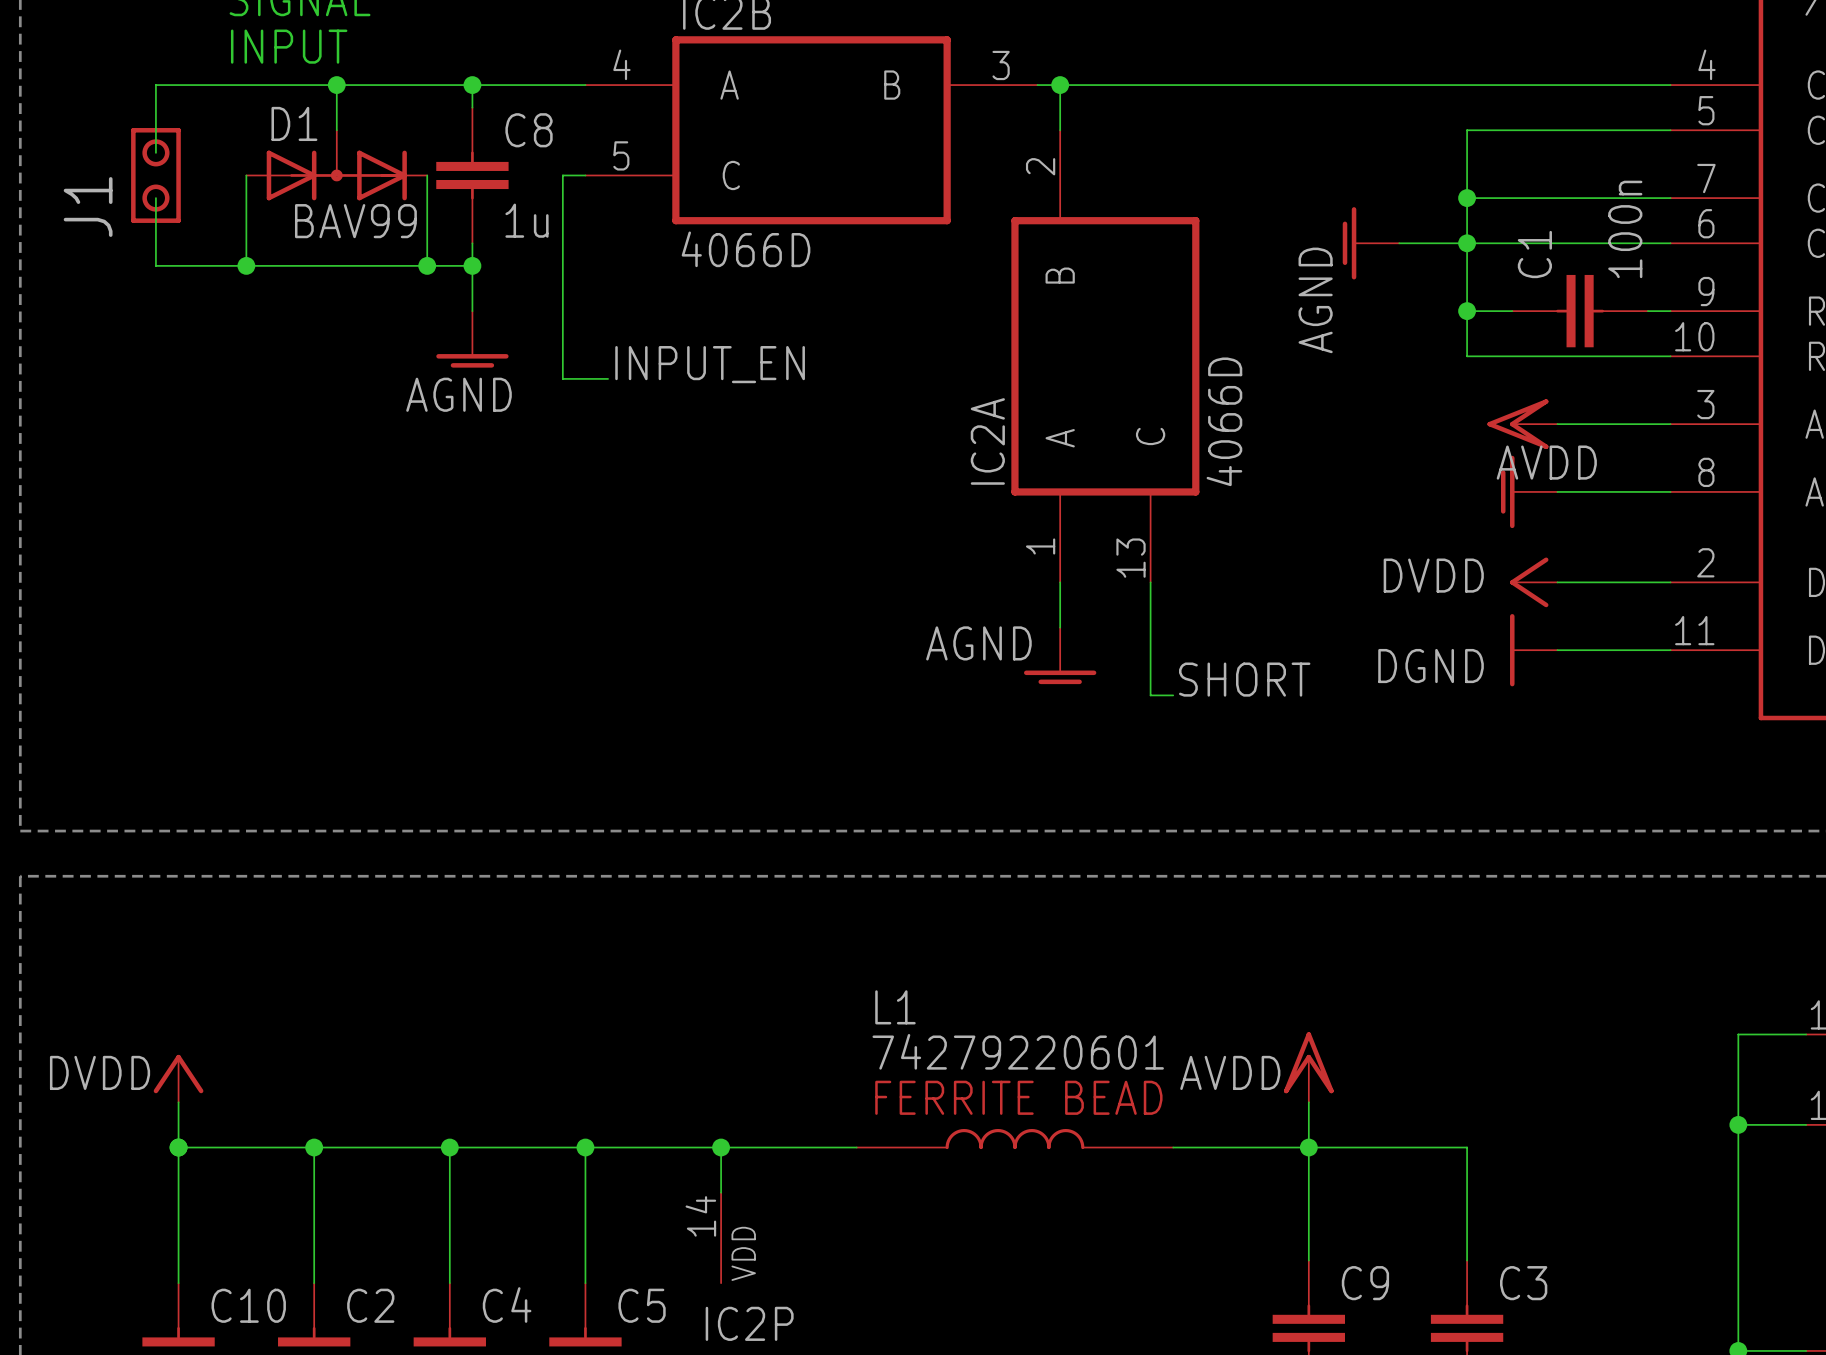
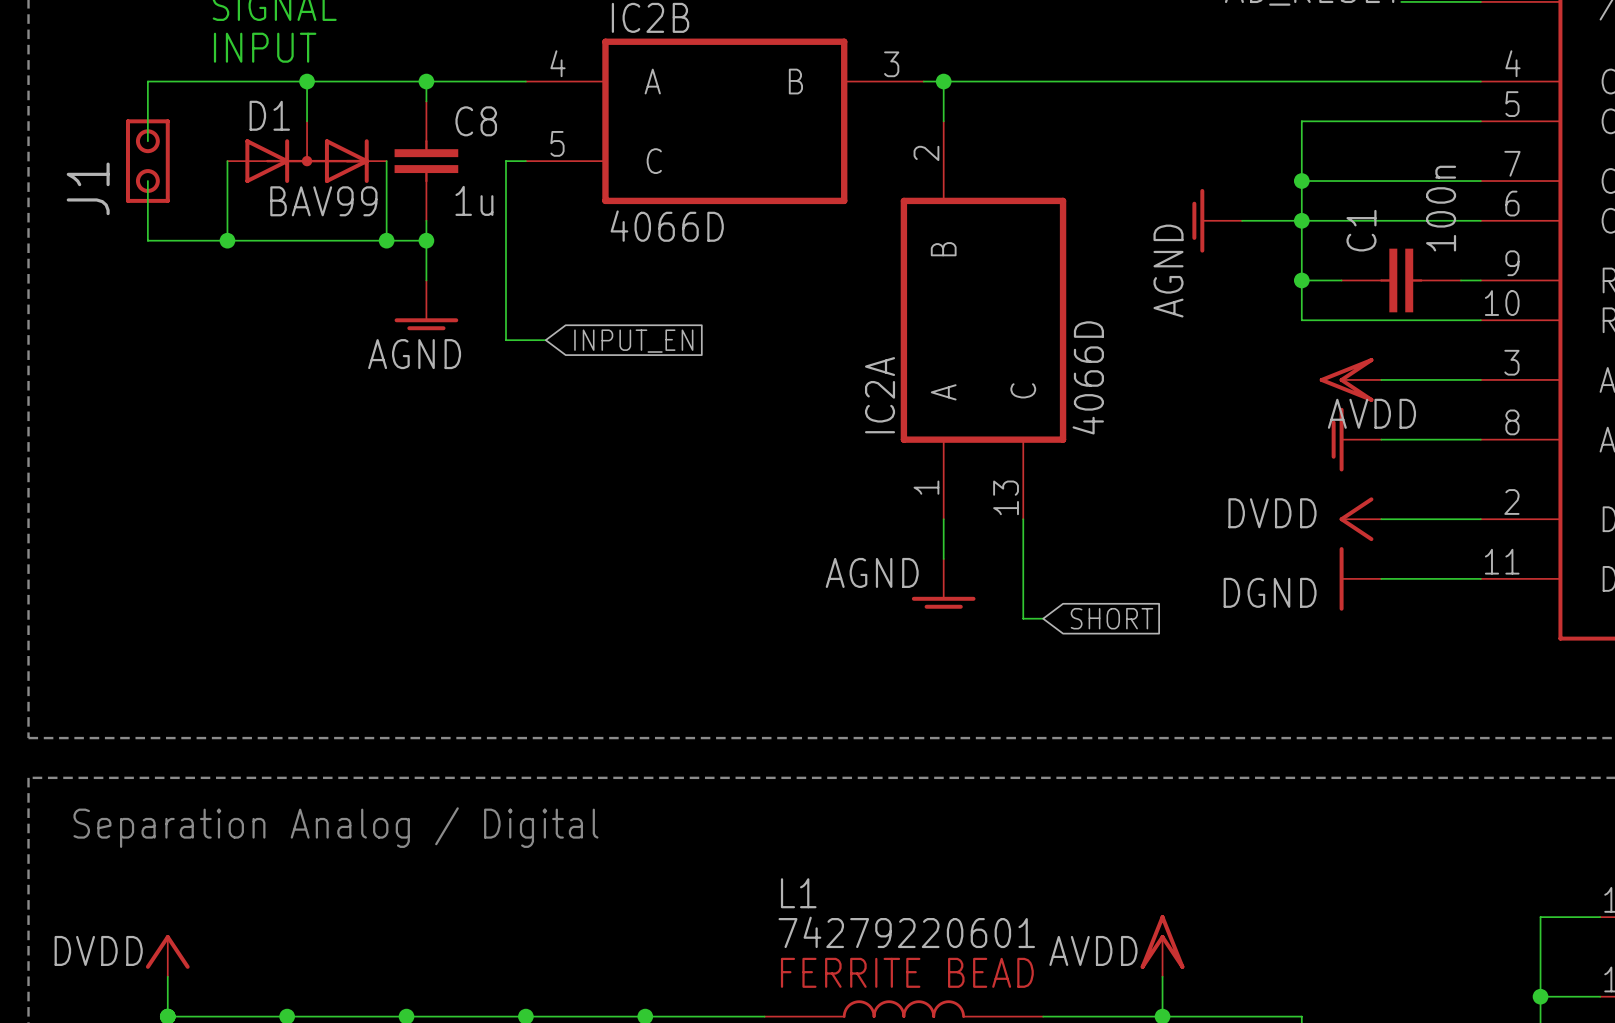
label: INPUT_EN (710, 364) -> none
global label: none -> INPUT_EN (633, 341)
label: SHORT (1244, 679) -> none
global label: none -> SHORT (1111, 618)
text: none -> Separation Analog / Digital (335, 827)

